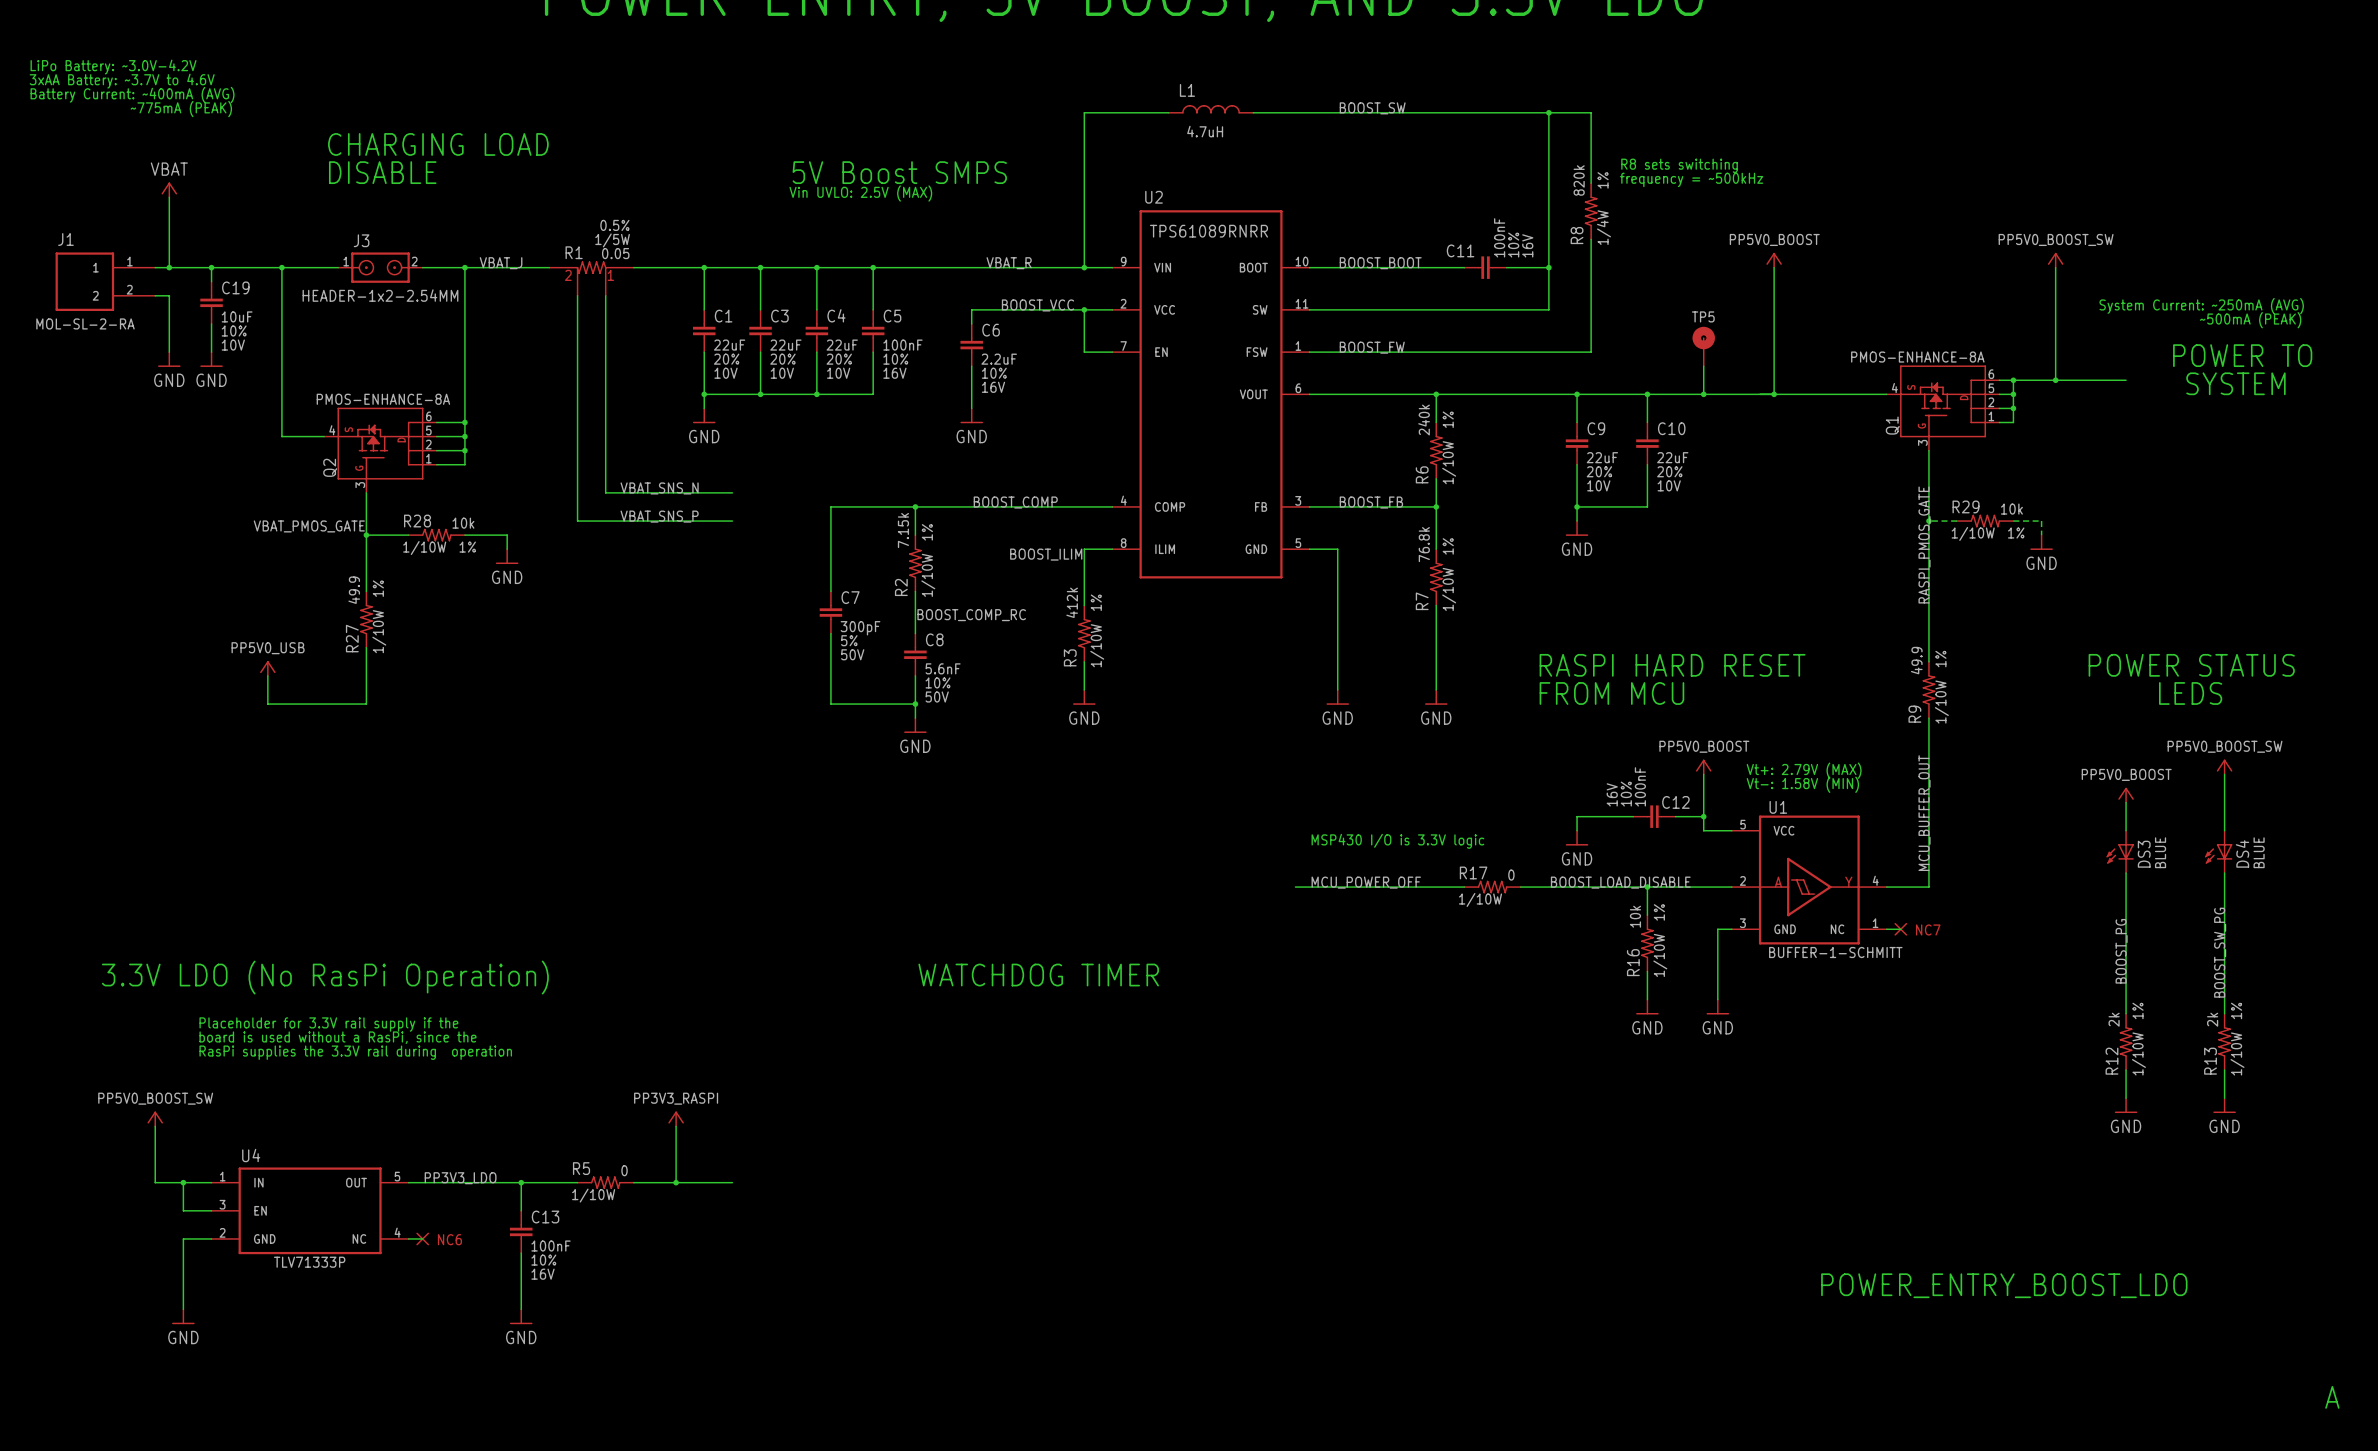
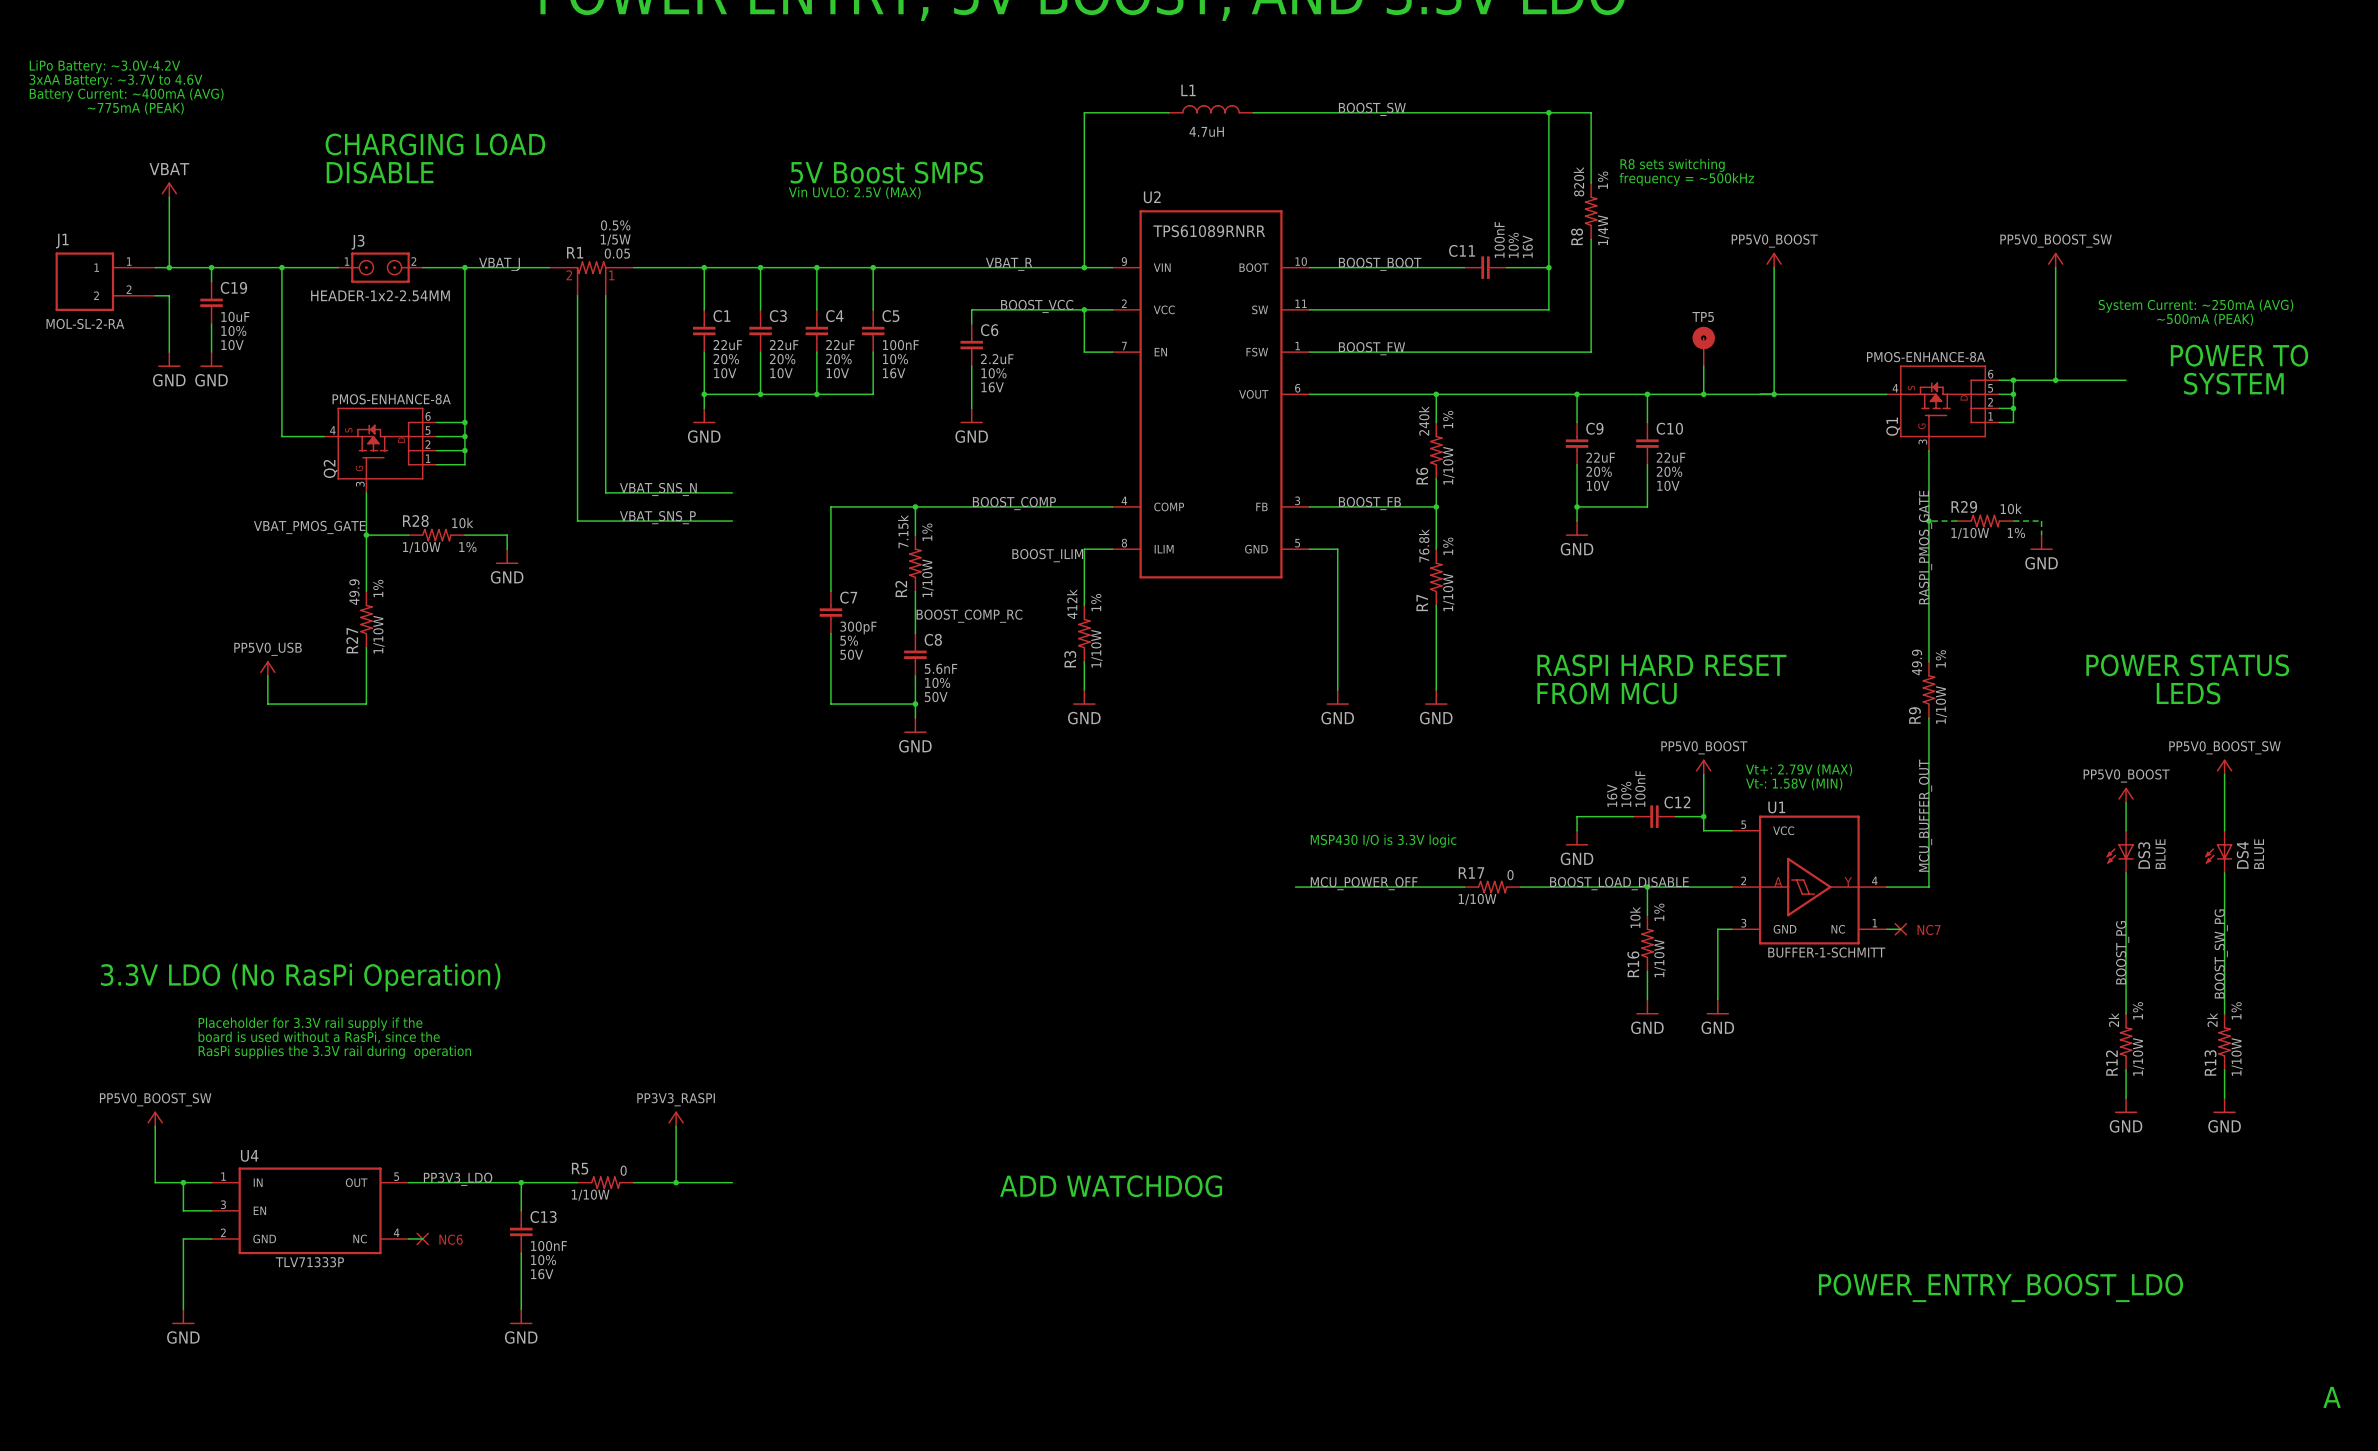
text: WATCHDOG TIMER (1038, 975) -> none
text: none -> ADD WATCHDOG (1111, 1186)

